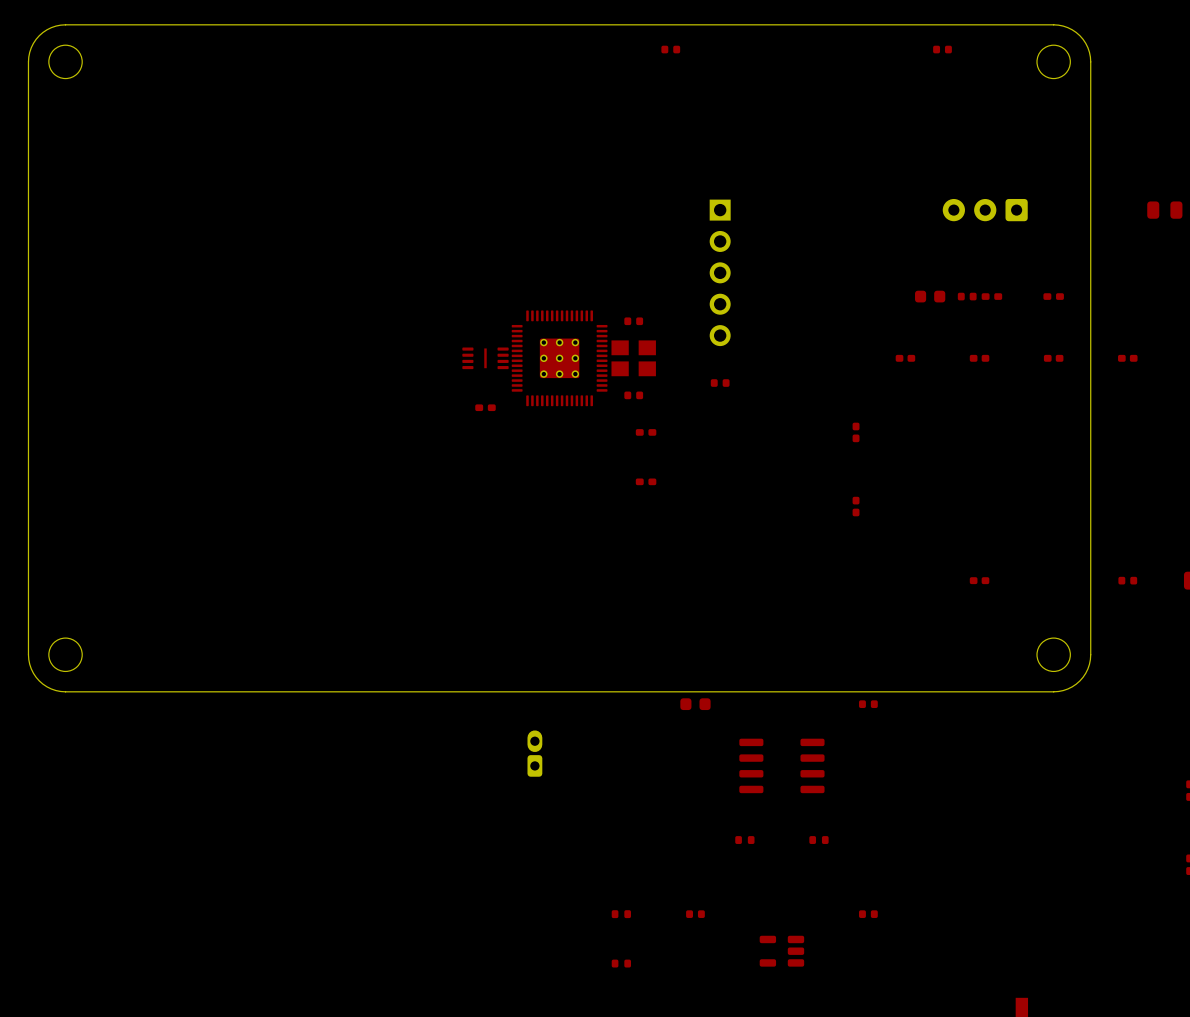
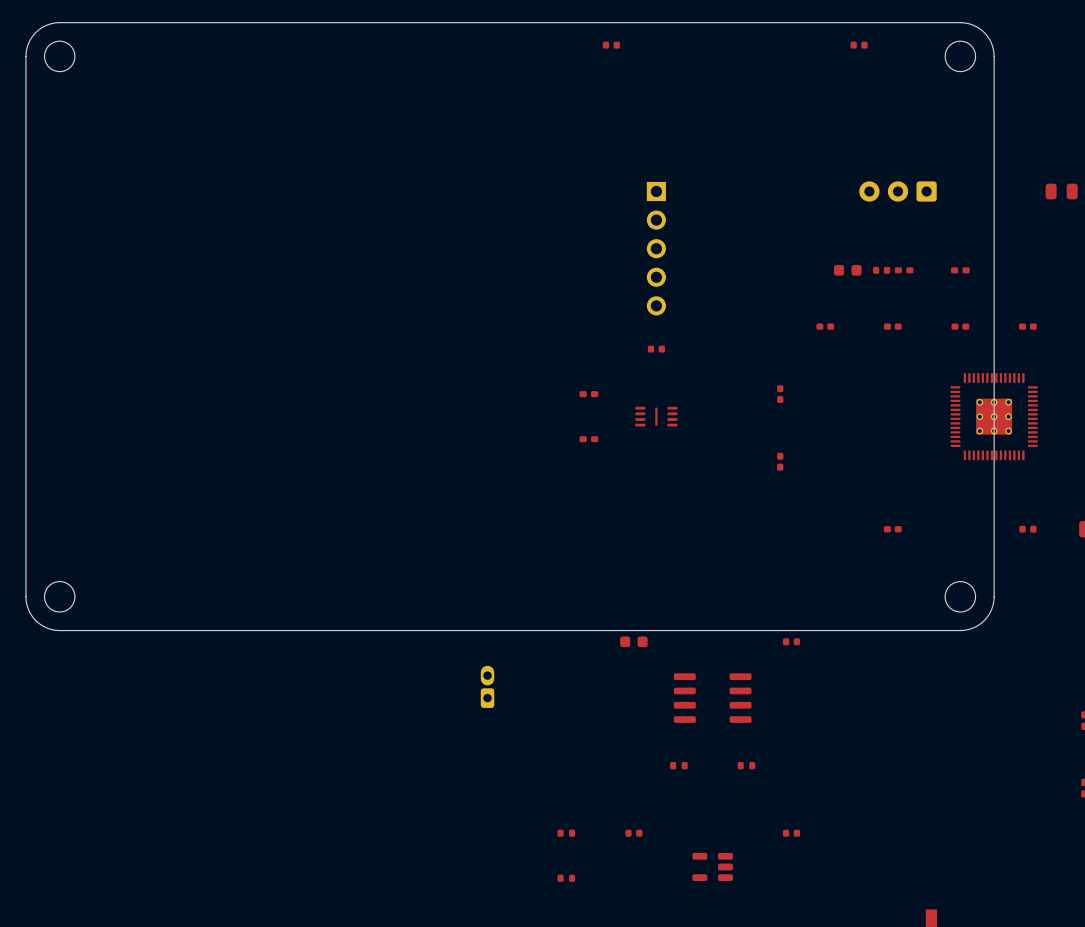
part: (633, 321) -> none
part position: (485, 358) -> (656, 416)
part: (559, 358) -> none
part: (633, 358) -> none
part: (633, 395) -> none
part: (485, 407) -> none
part: none -> (994, 416)

